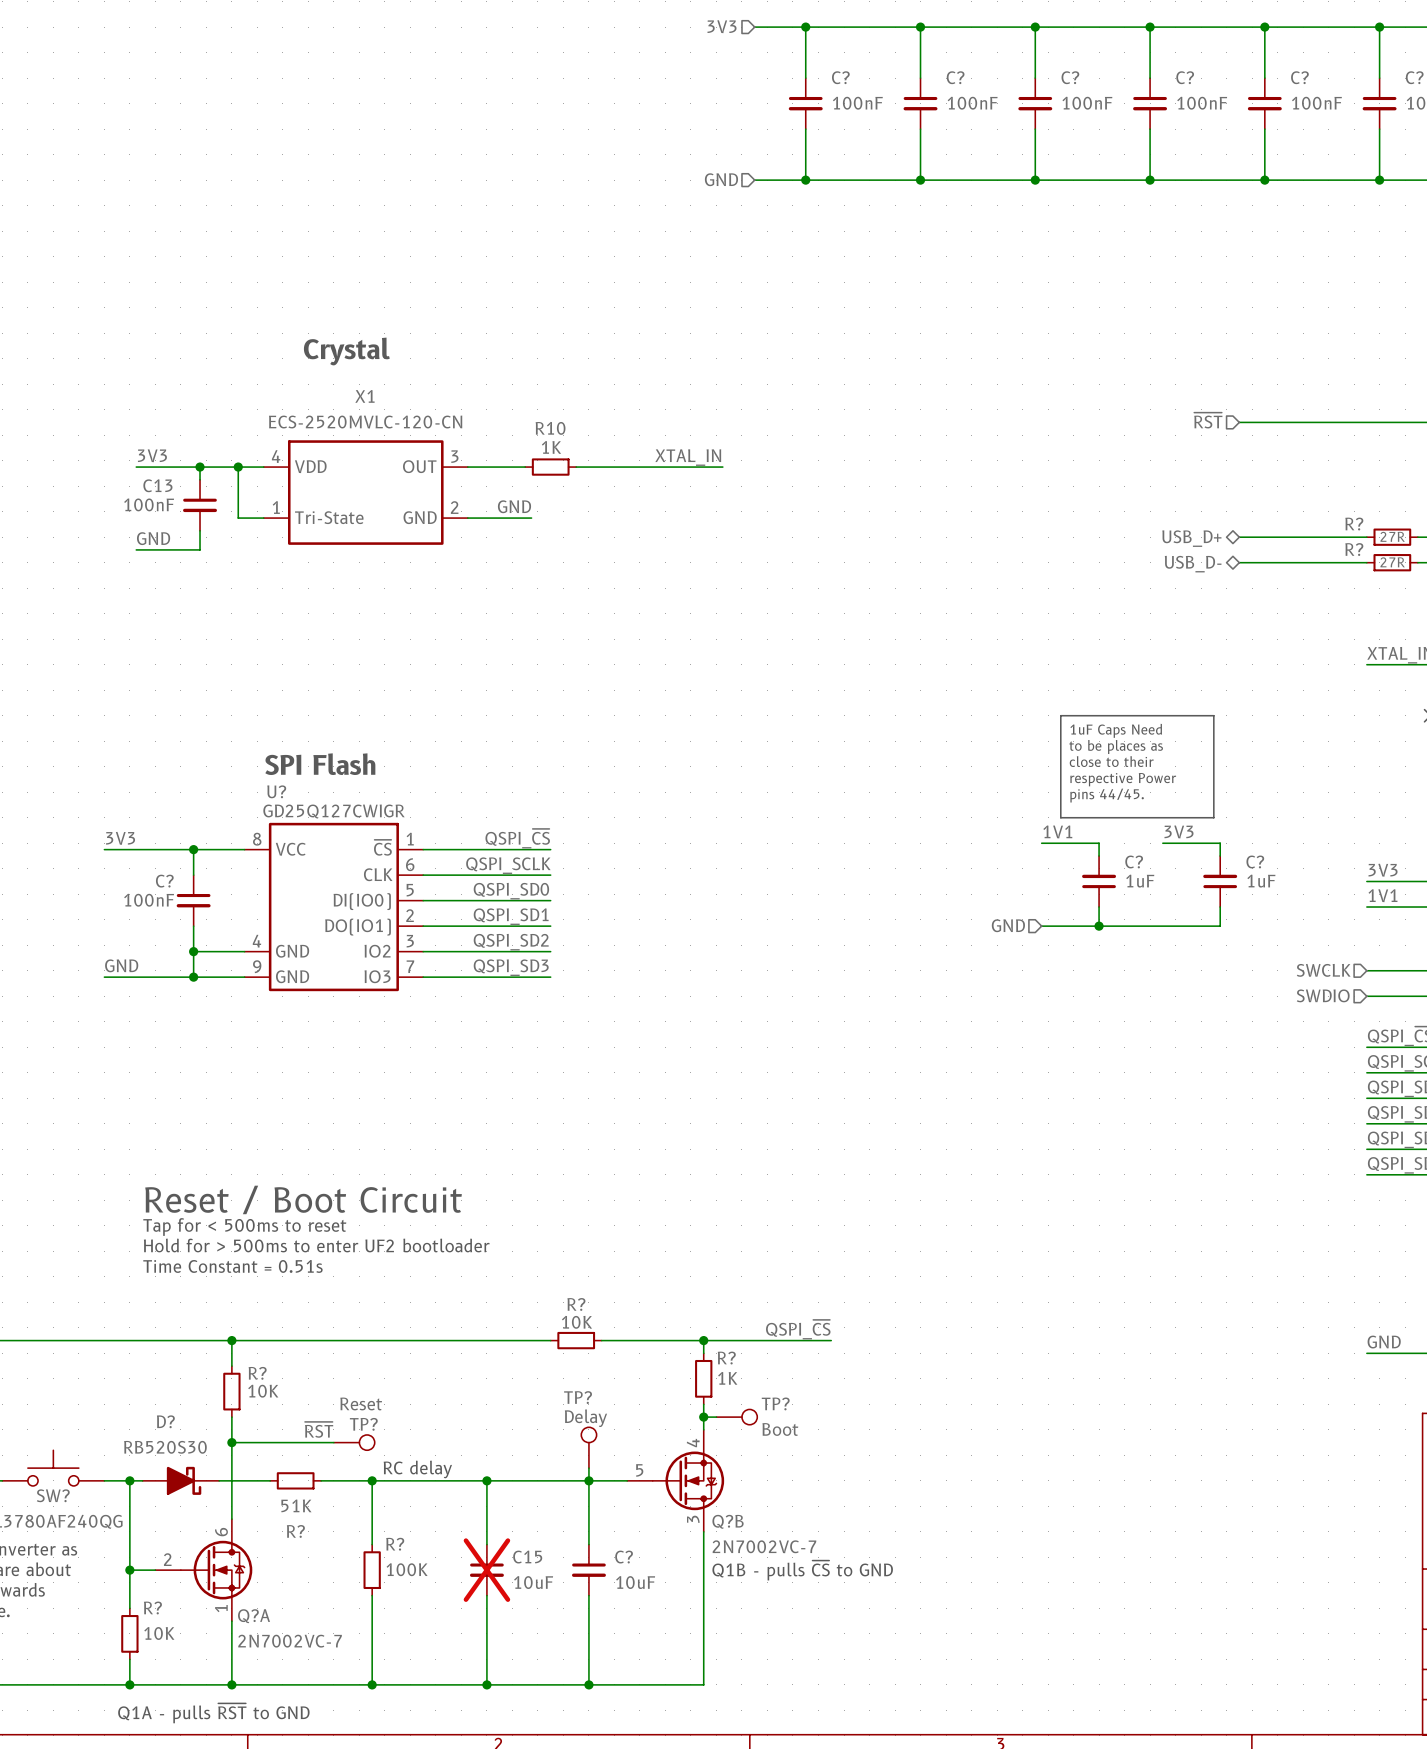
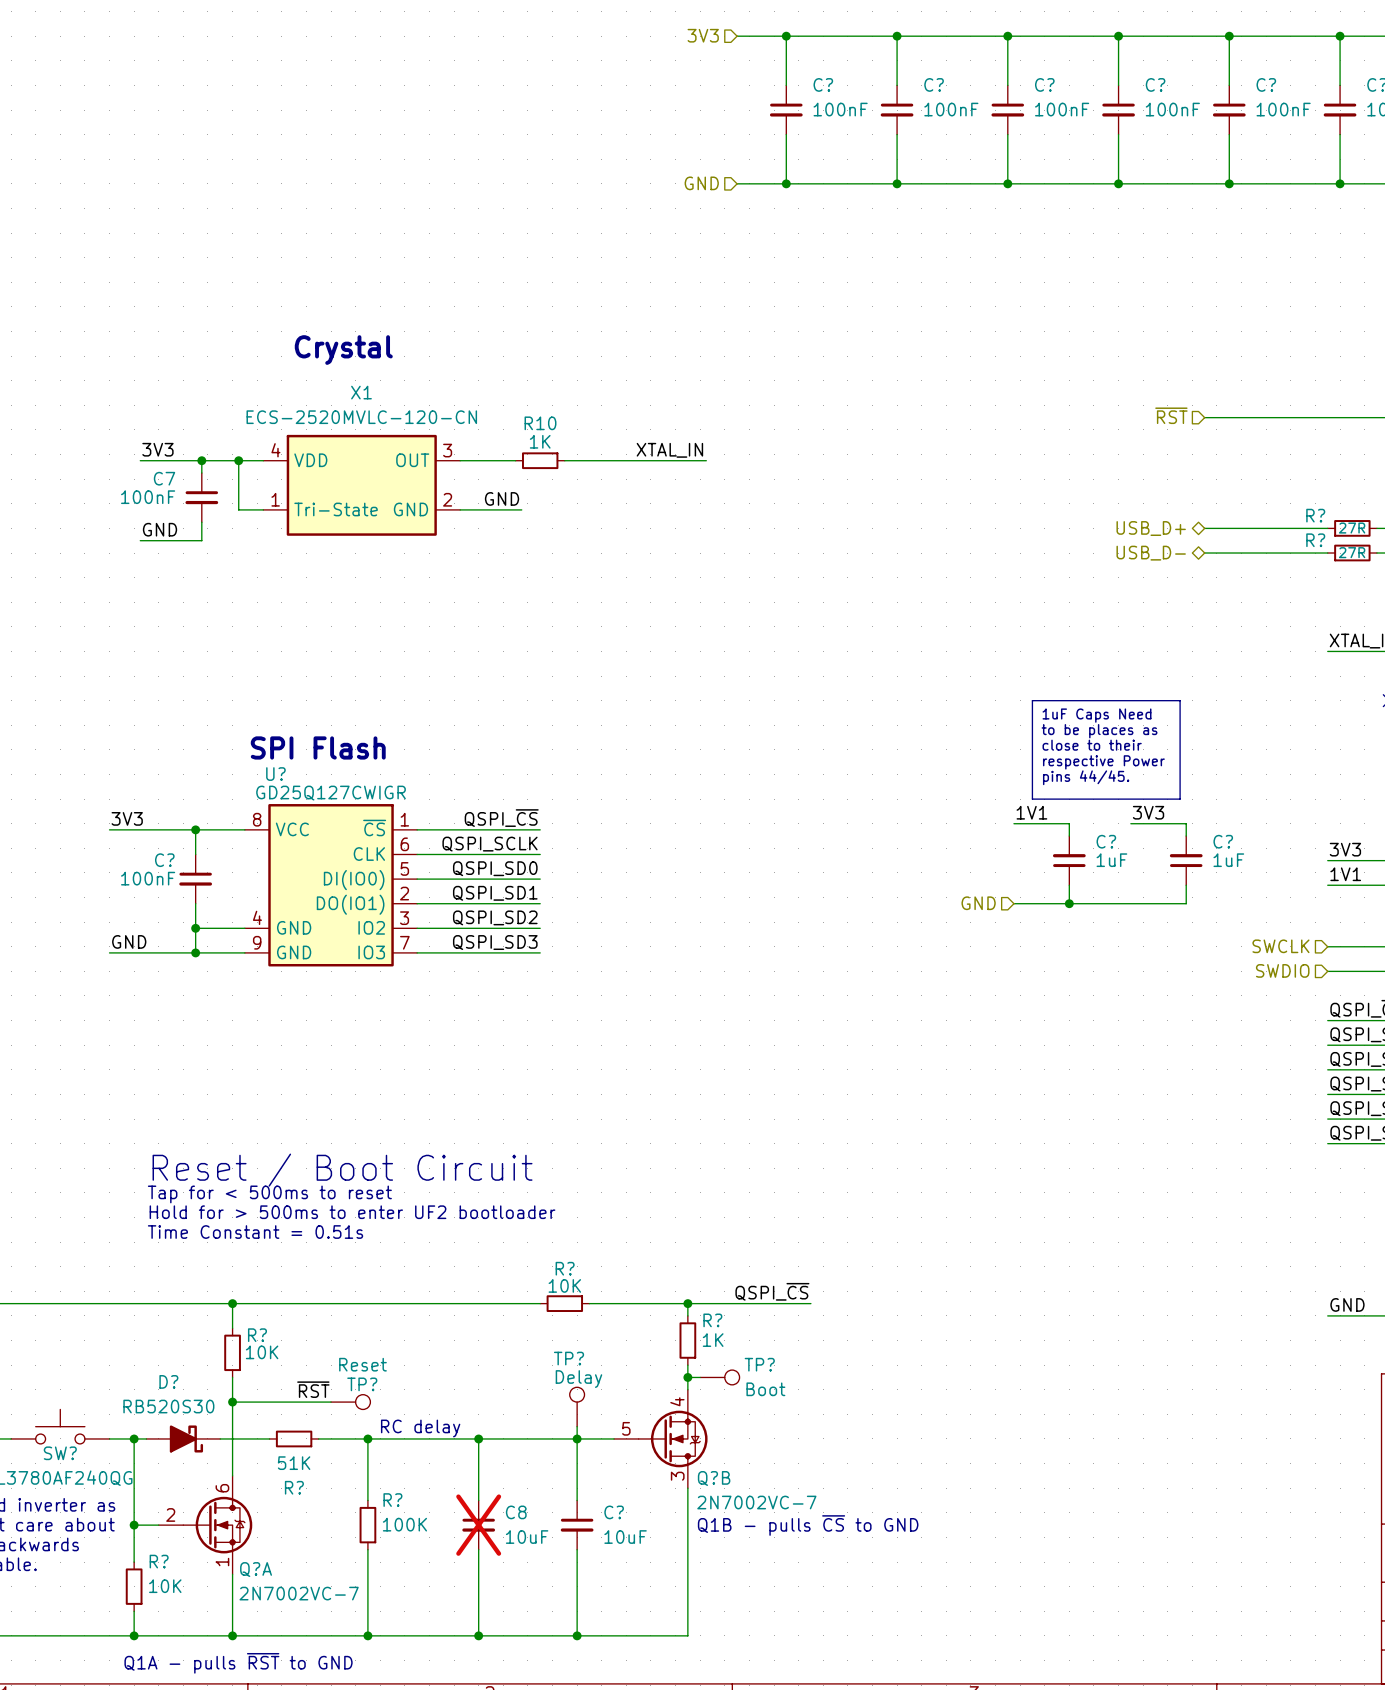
C13 name: C13 (157, 485) -> C7 (164, 478)
C15 name: C15 (527, 1557) -> C8 (516, 1512)

